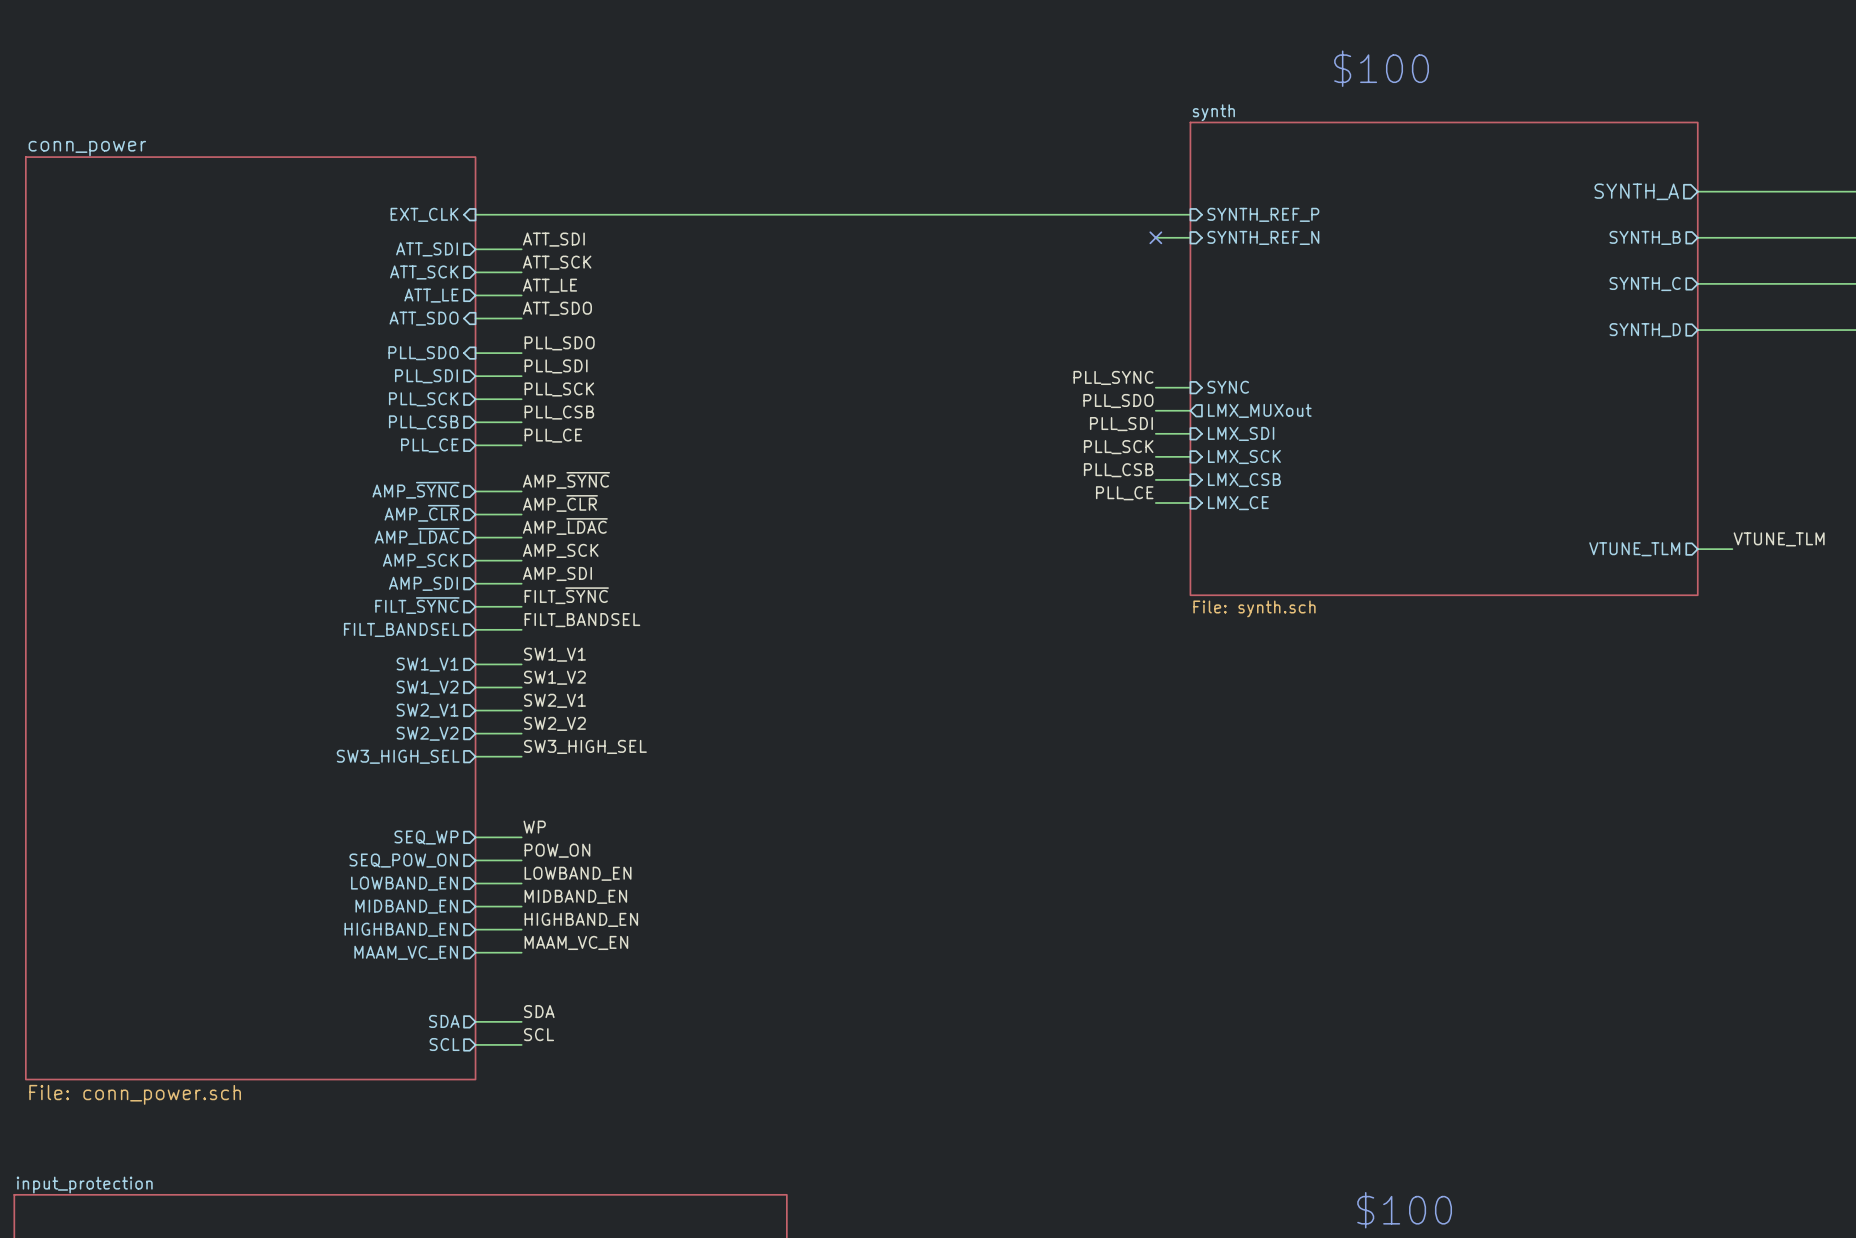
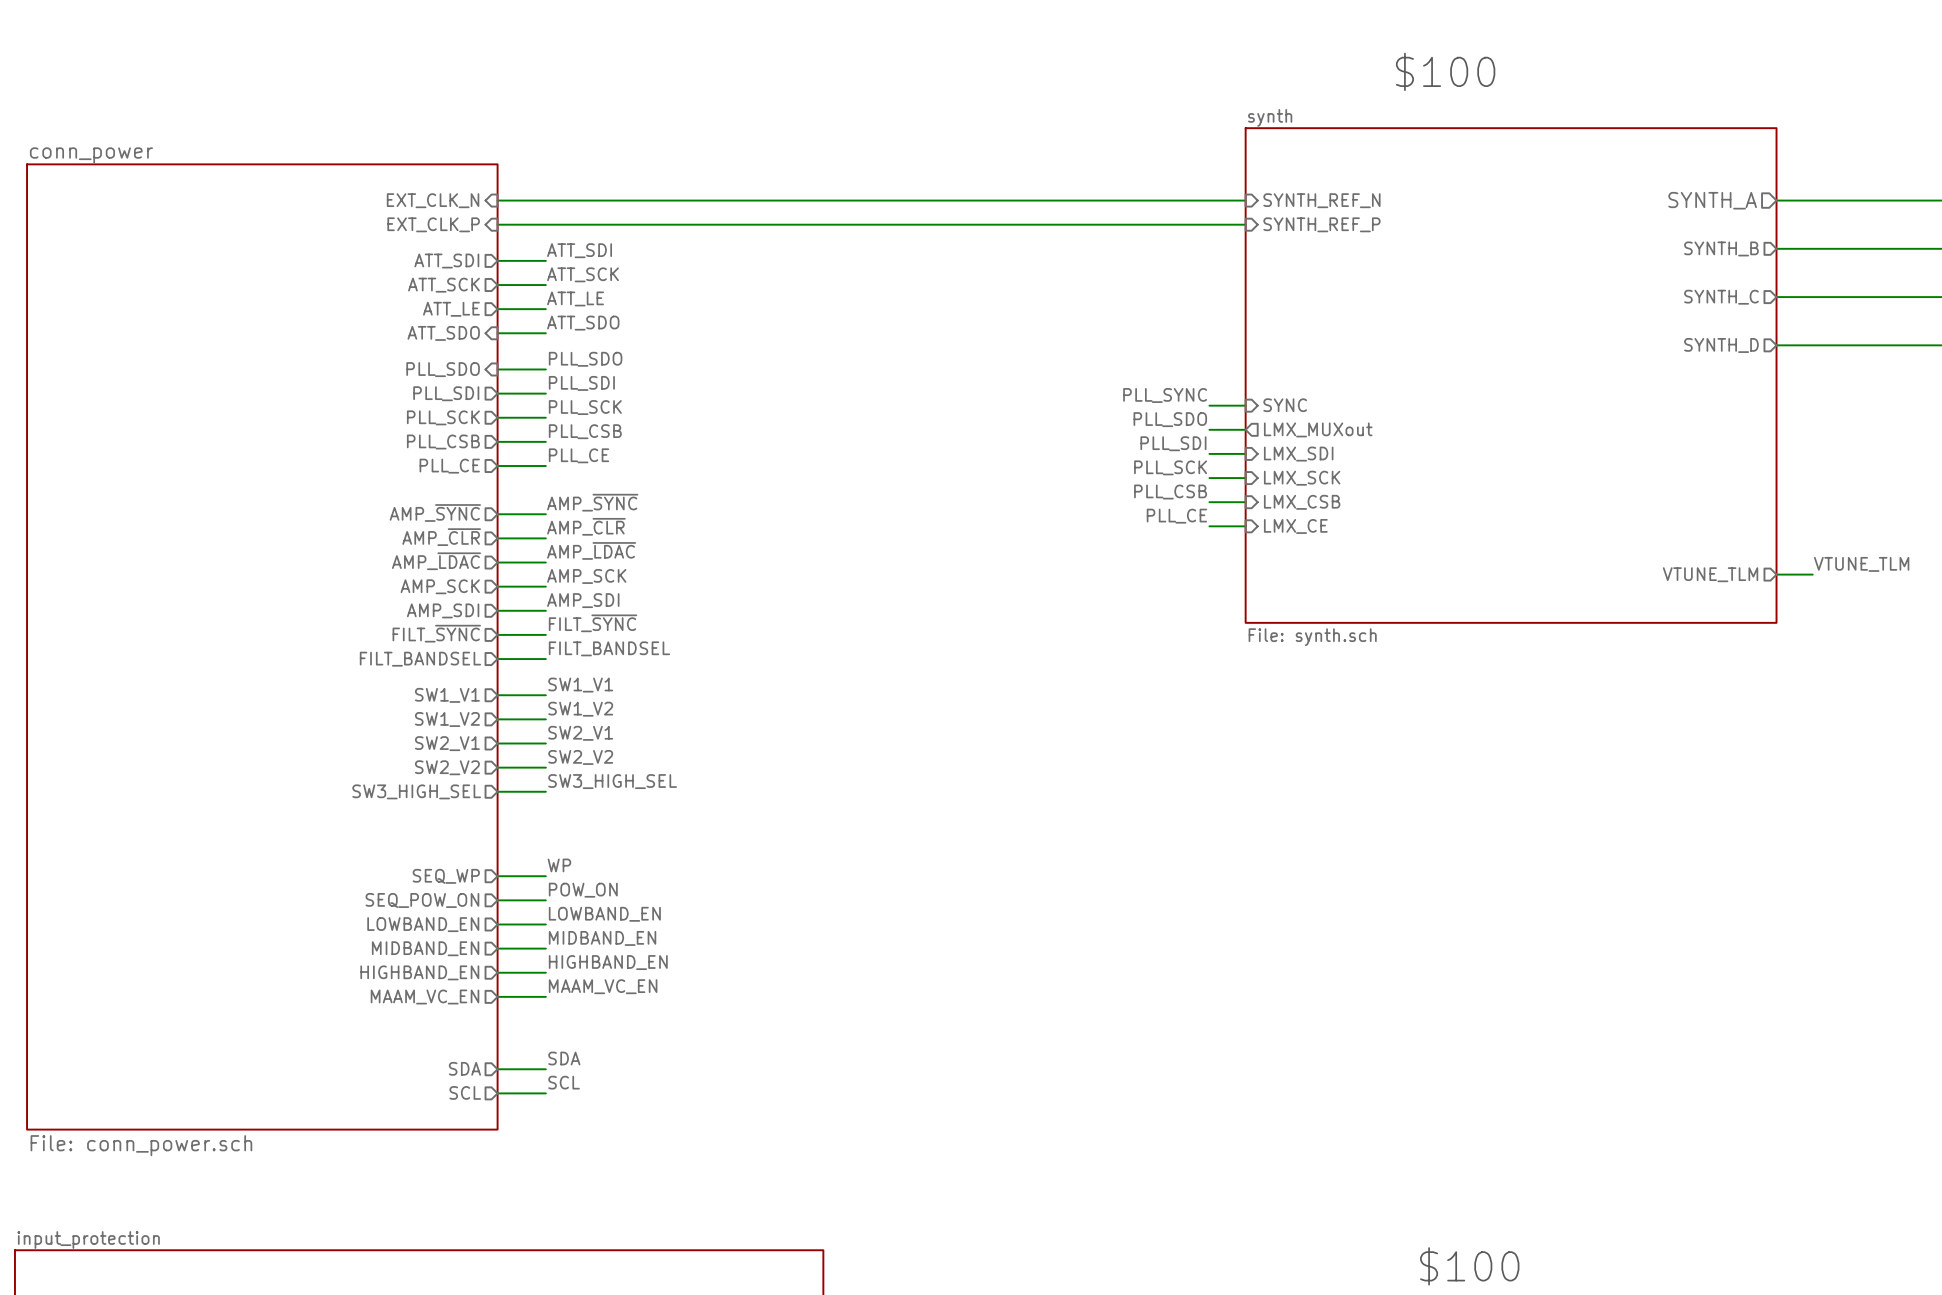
sheet pin: none -> EXT_CLK_N (433, 200)
wire: none -> (497, 200) (1245, 200)
sheet pin: EXT_CLK (424, 214) -> EXT_CLK_P (433, 224)
wire: (1155, 237) (1190, 237) -> none
no-connect mark: (1155, 237) -> none
sheet pin position: SYNTH_REF_N (1263, 237) -> SYNTH_REF_N (1321, 200)

